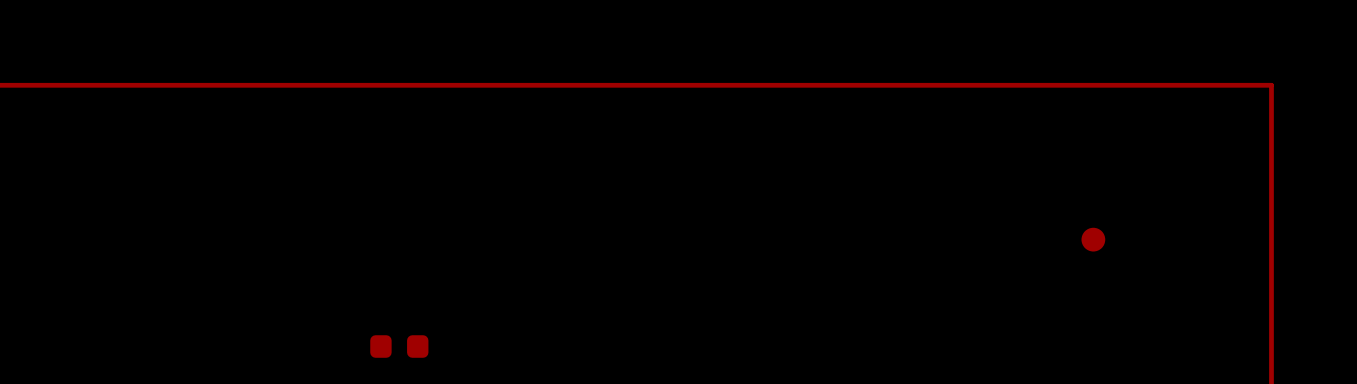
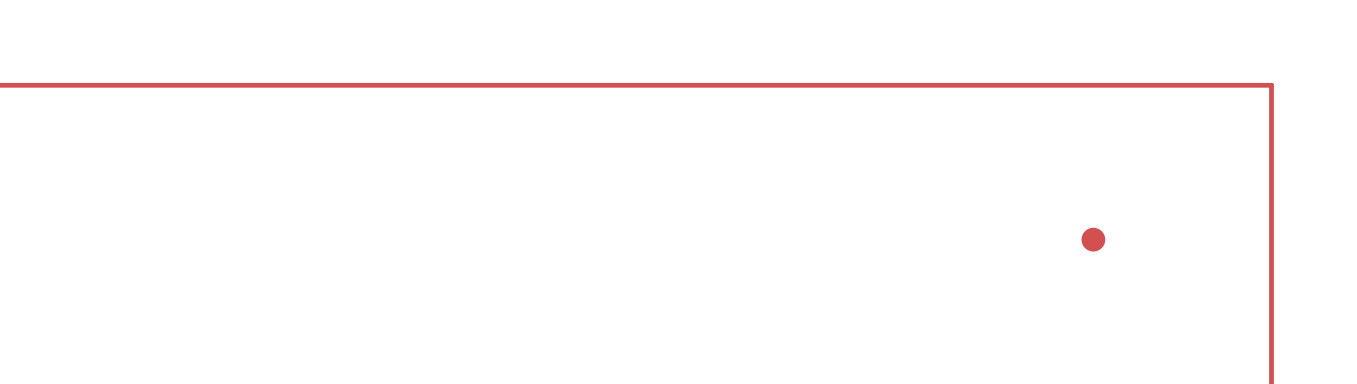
part: (399, 346) -> none

